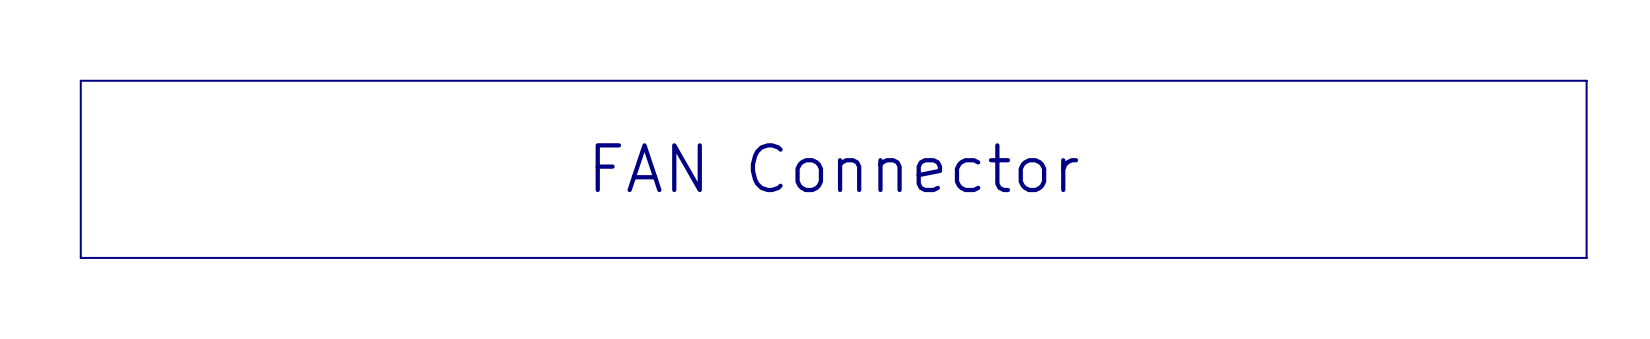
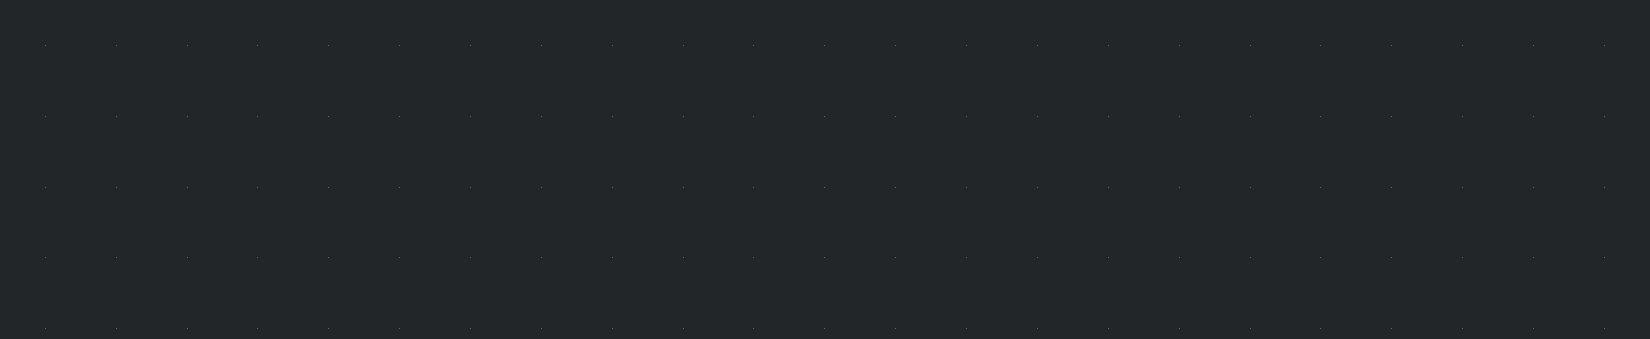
line: (80, 80) (1586, 80) (1586, 257) (80, 257) (80, 80) -> none
text: FAN Connector (836, 167) -> none

